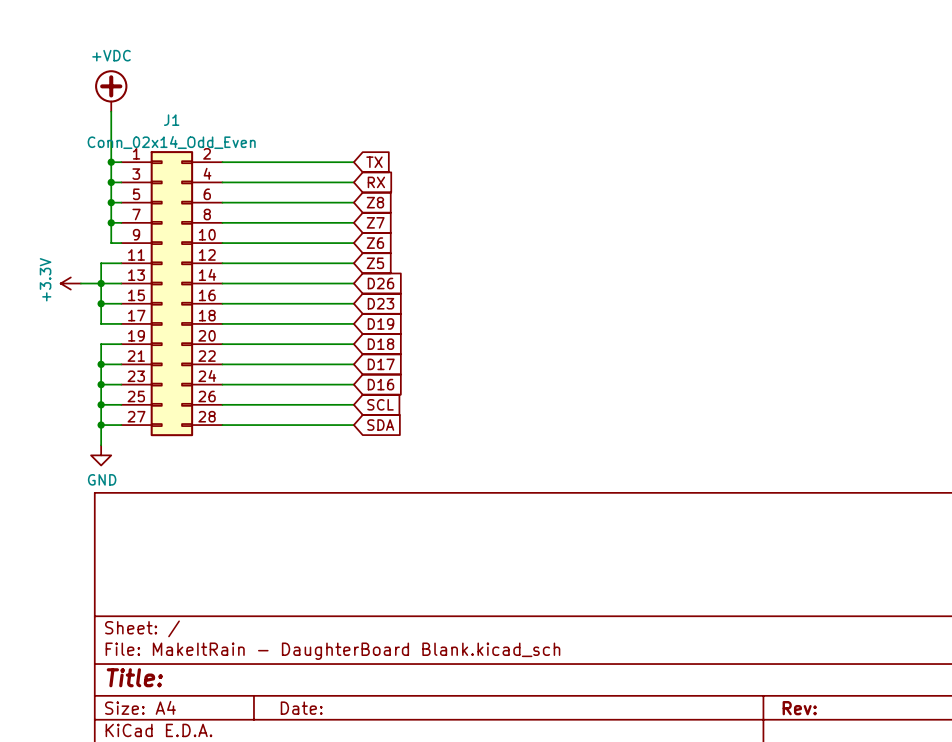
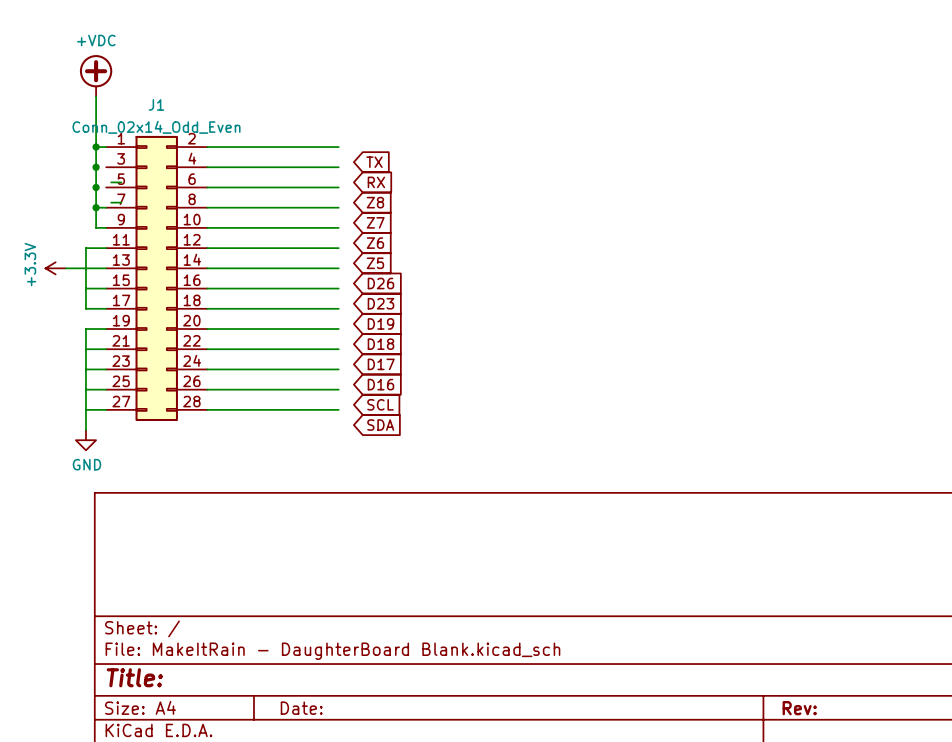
power symbol position: +VDC (111, 90) -> +VDC (96, 75)
wire: (111, 111) (111, 243) (121, 243) -> (96, 96) (96, 227) (106, 227)
junction: none -> (96, 147)
wire: (111, 162) (121, 162) -> (96, 147) (106, 147)
junction: (111, 162) -> none
wire: (222, 162) (353, 162) -> (207, 147) (338, 147)
junction: none -> (96, 167)
junction: (111, 182) -> none
wire: (222, 182) (353, 182) -> (207, 167) (338, 167)
junction: none -> (96, 187)
junction: (111, 202) -> none
wire: (222, 202) (353, 202) -> (207, 187) (338, 187)
junction: none -> (96, 207)
wire: (111, 222) (121, 222) -> (96, 207) (106, 207)
junction: (111, 222) -> none
wire: (222, 222) (353, 222) -> (207, 207) (338, 207)
wire: (222, 243) (353, 243) -> (207, 227) (338, 227)
wire: (121, 263) (101, 263) (101, 323) (121, 323) -> (106, 248) (85, 248) (85, 308) (106, 308)
wire: (222, 263) (353, 263) -> (207, 248) (338, 248)
power symbol position: +3.3V (70, 283) -> +3.3V (55, 268)
wire: (80, 283) (121, 283) -> (65, 268) (106, 268)
junction: (101, 283) -> none
wire: (222, 283) (353, 283) -> (207, 268) (338, 268)
J1 position: (171, 293) -> (156, 278)
wire: (101, 303) (121, 303) -> (85, 288) (106, 288)
junction: (101, 303) -> none
wire: (222, 303) (353, 303) -> (207, 288) (338, 288)
wire: (222, 323) (353, 323) -> (207, 308) (338, 308)
wire: (121, 344) (101, 344) (101, 445) -> (106, 329) (85, 329) (85, 430)
wire: (222, 344) (353, 344) -> (207, 329) (338, 329)
wire: (101, 364) (121, 364) -> (85, 349) (106, 349)
junction: (101, 364) -> none
wire: (222, 364) (353, 364) -> (207, 349) (338, 349)
wire: (101, 384) (121, 384) -> (85, 369) (106, 369)
junction: (101, 384) -> none
wire: (222, 384) (353, 384) -> (207, 369) (338, 369)
wire: (101, 404) (121, 404) -> (85, 389) (106, 389)
junction: (101, 404) -> none
wire: (222, 404) (353, 404) -> (207, 389) (338, 389)
wire: (101, 425) (121, 425) -> (85, 409) (106, 409)
junction: (101, 425) -> none
wire: (222, 425) (353, 425) -> (207, 409) (338, 409)
power symbol position: GND (101, 455) -> GND (85, 440)

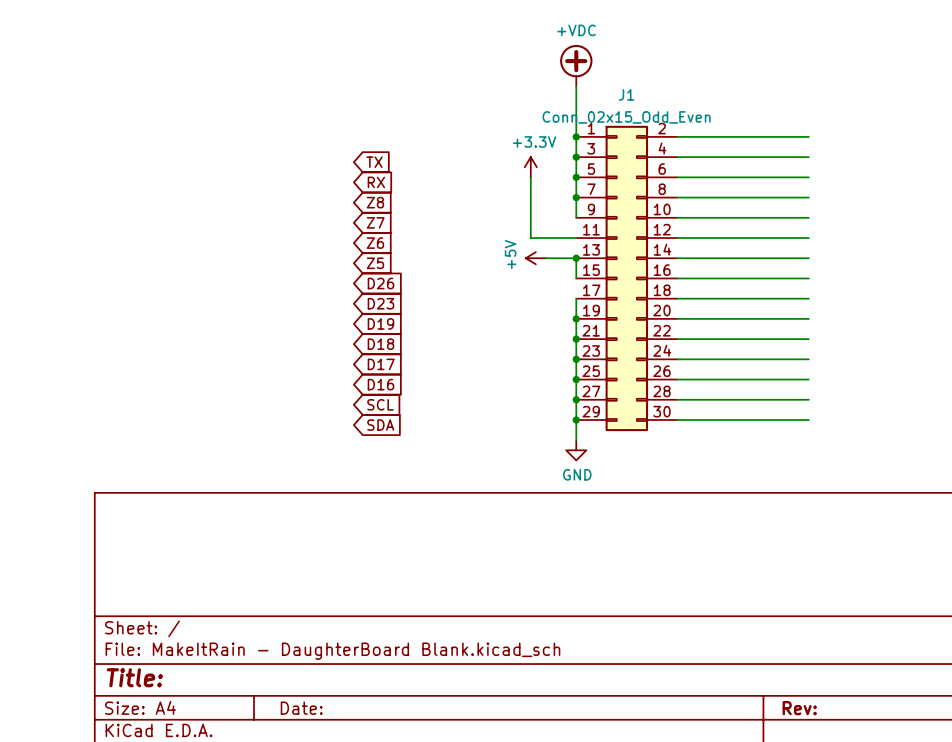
power symbol: none -> +VDC (576, 65)
power symbol: +VDC (96, 75) -> none
wire: none -> (576, 86) (576, 217)
wire: (96, 96) (96, 227) (106, 227) -> none
J1 value: Conn_02x14_Odd_Even (156, 127) -> Conn_02x15_Odd_Even (626, 117)
J1 symbol: [106, 135, 208, 422] -> [576, 125, 678, 432]
junction: none -> (576, 136)
wire: none -> (677, 136) (808, 136)
wire: (96, 147) (106, 147) -> none
junction: (96, 147) -> none
wire: (207, 147) (338, 147) -> none
junction: none -> (576, 157)
wire: none -> (677, 157) (808, 157)
junction: (96, 167) -> none
wire: (207, 167) (338, 167) -> none
power symbol: none -> +3.3V (530, 167)
wire: none -> (530, 177) (530, 238) (576, 238)
junction: none -> (576, 177)
wire: none -> (677, 177) (808, 177)
wire: (111, 182) (121, 182) -> none
junction: (96, 187) -> none
wire: (207, 187) (338, 187) -> none
junction: none -> (576, 197)
wire: none -> (677, 197) (808, 197)
wire: (111, 202) (121, 202) -> none
wire: (96, 207) (106, 207) -> none
junction: (96, 207) -> none
wire: (207, 207) (338, 207) -> none
wire: none -> (677, 217) (808, 217)
wire: (207, 227) (338, 227) -> none
wire: none -> (677, 238) (808, 238)
wire: (106, 248) (85, 248) (85, 308) (106, 308) -> none
wire: (207, 248) (338, 248) -> none
power symbol: none -> +5V (535, 258)
wire: none -> (545, 258) (576, 258) (576, 278)
junction: none -> (576, 258)
wire: none -> (677, 258) (808, 258)
power symbol: +3.3V (55, 268) -> none
wire: (65, 268) (106, 268) -> none
wire: (207, 268) (338, 268) -> none
wire: none -> (677, 278) (808, 278)
wire: (85, 288) (106, 288) -> none
wire: (207, 288) (338, 288) -> none
wire: none -> (576, 298) (576, 440)
wire: none -> (677, 298) (808, 298)
wire: (207, 308) (338, 308) -> none
junction: none -> (576, 318)
wire: none -> (677, 318) (808, 318)
wire: (106, 329) (85, 329) (85, 430) -> none
wire: (207, 329) (338, 329) -> none
junction: none -> (576, 339)
wire: none -> (677, 339) (808, 339)
wire: (85, 349) (106, 349) -> none
wire: (207, 349) (338, 349) -> none
junction: none -> (576, 359)
wire: none -> (677, 359) (808, 359)
wire: (85, 369) (106, 369) -> none
wire: (207, 369) (338, 369) -> none
junction: none -> (576, 379)
wire: none -> (677, 379) (808, 379)
wire: (85, 389) (106, 389) -> none
wire: (207, 389) (338, 389) -> none
junction: none -> (576, 399)
wire: none -> (677, 399) (808, 399)
wire: (85, 409) (106, 409) -> none
wire: (207, 409) (338, 409) -> none
junction: none -> (576, 419)
wire: none -> (677, 419) (808, 419)
power symbol: GND (85, 440) -> none
power symbol: none -> GND (576, 450)

